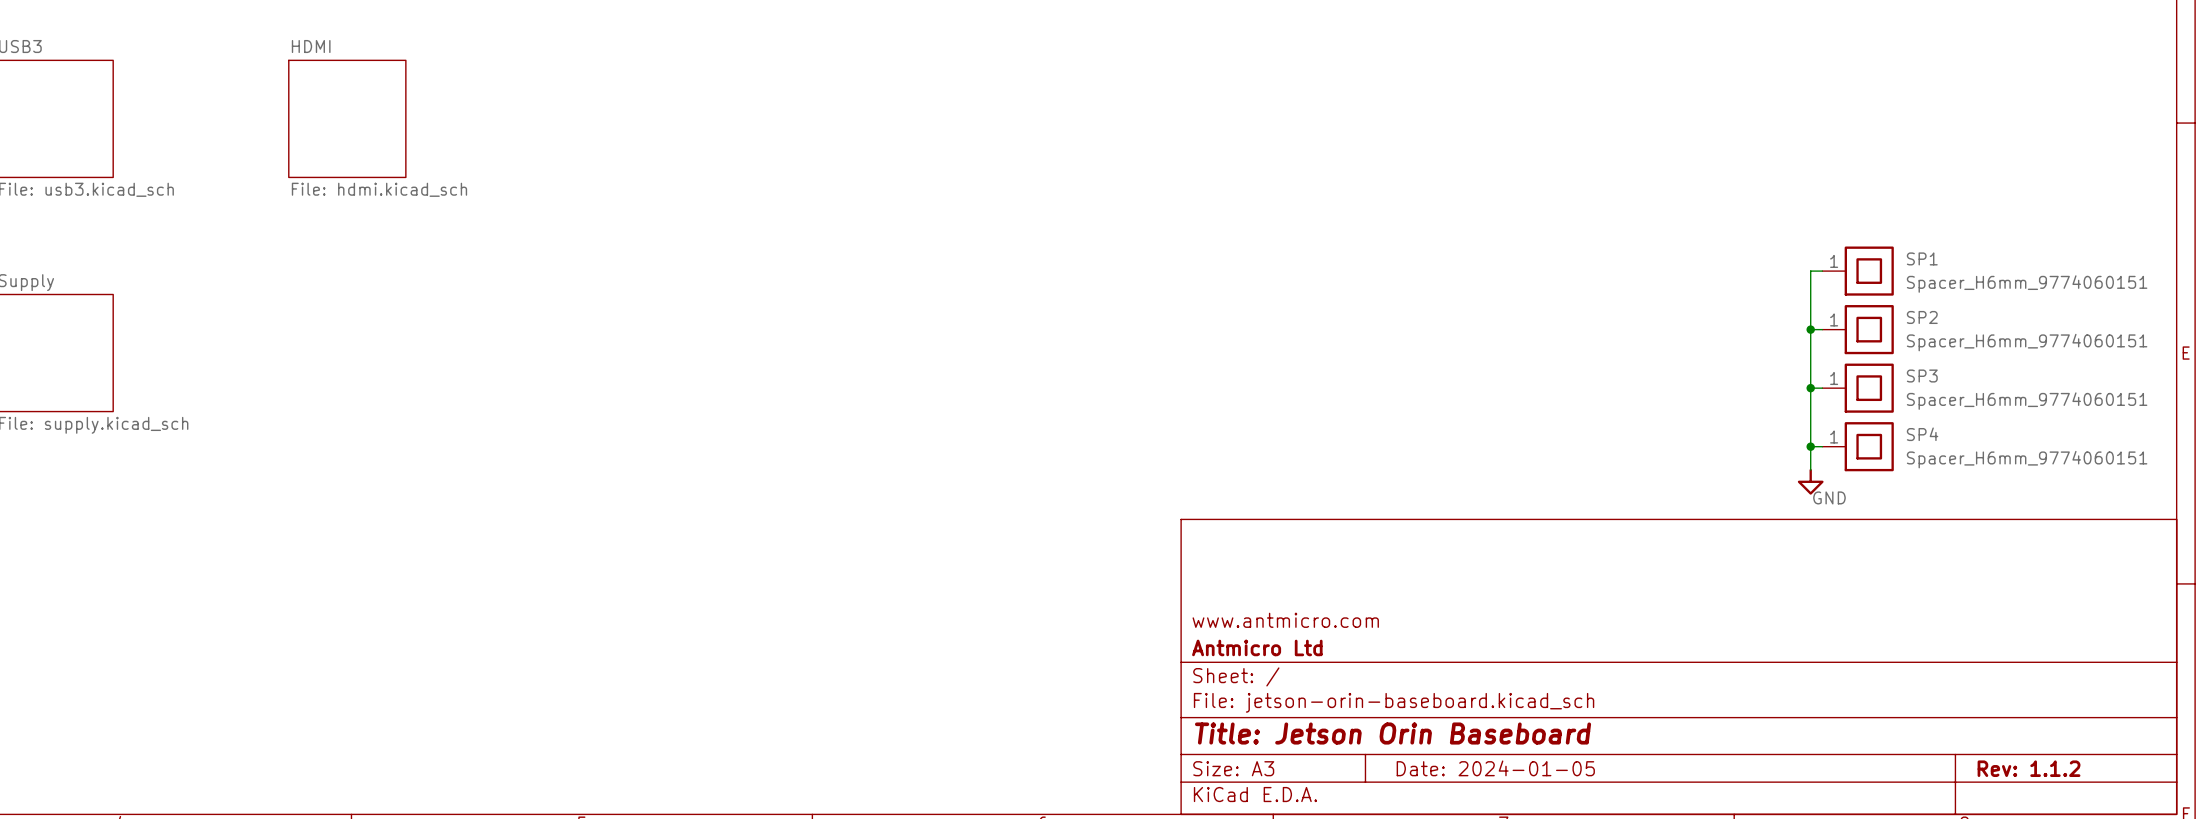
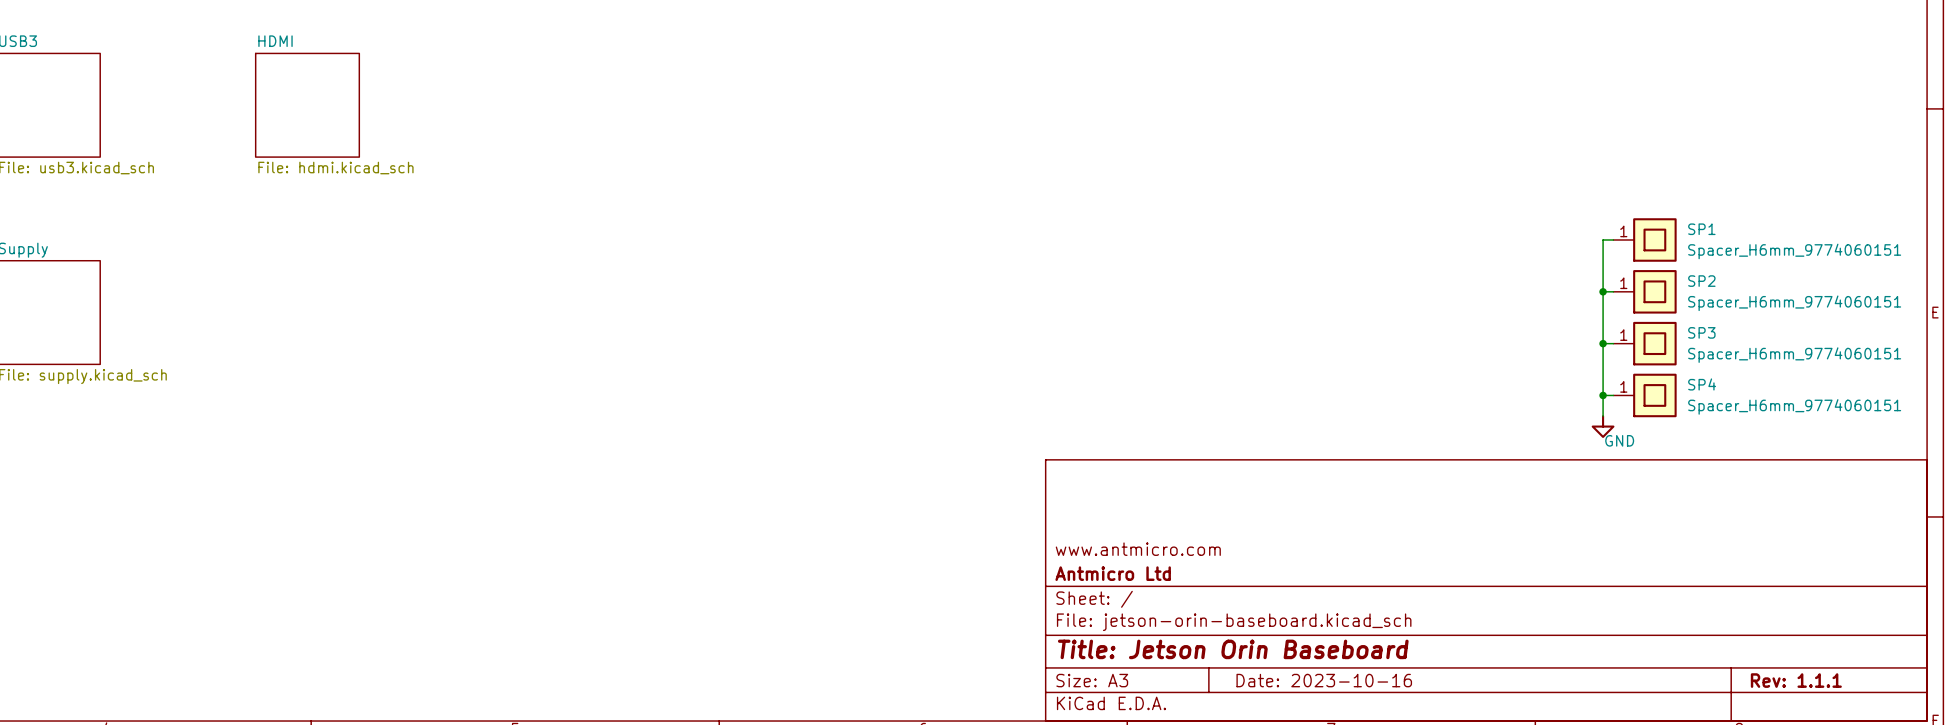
title block: Date: 2024-01-05 (1495, 768) -> Date: 2023-10-16 (1324, 680)
title block: Rev: 1.1.2 (2029, 768) -> Rev: 1.1.1 (1796, 680)

